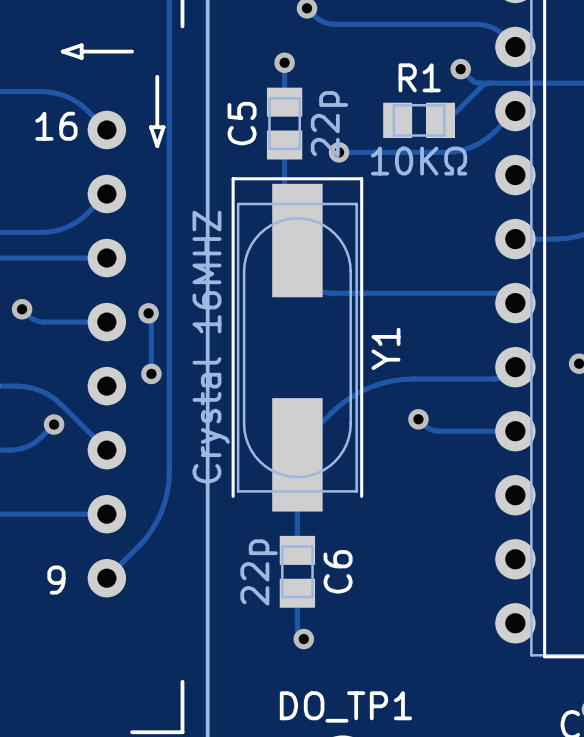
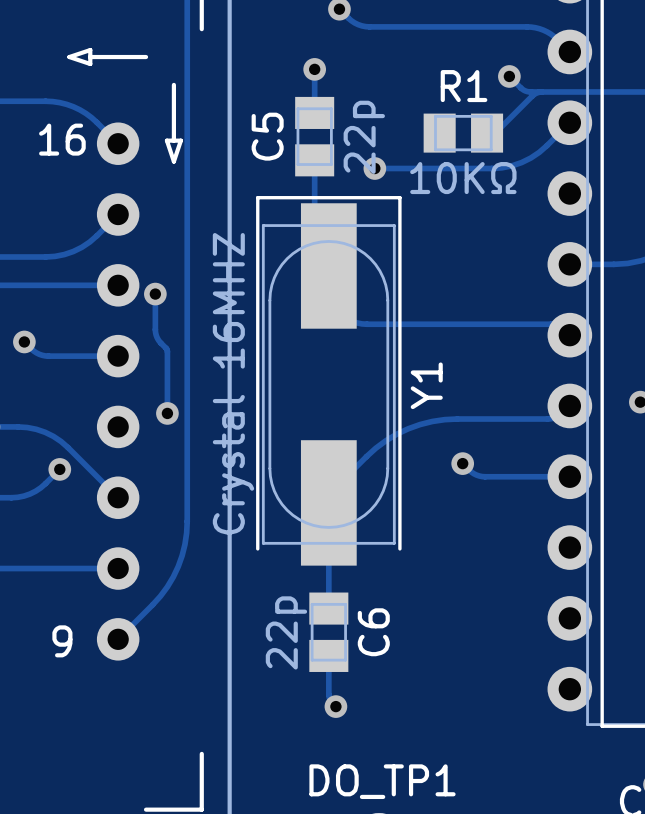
track: none -> (155, 294) (155, 333) (164, 346)
via position: (148, 313) -> (155, 294)

